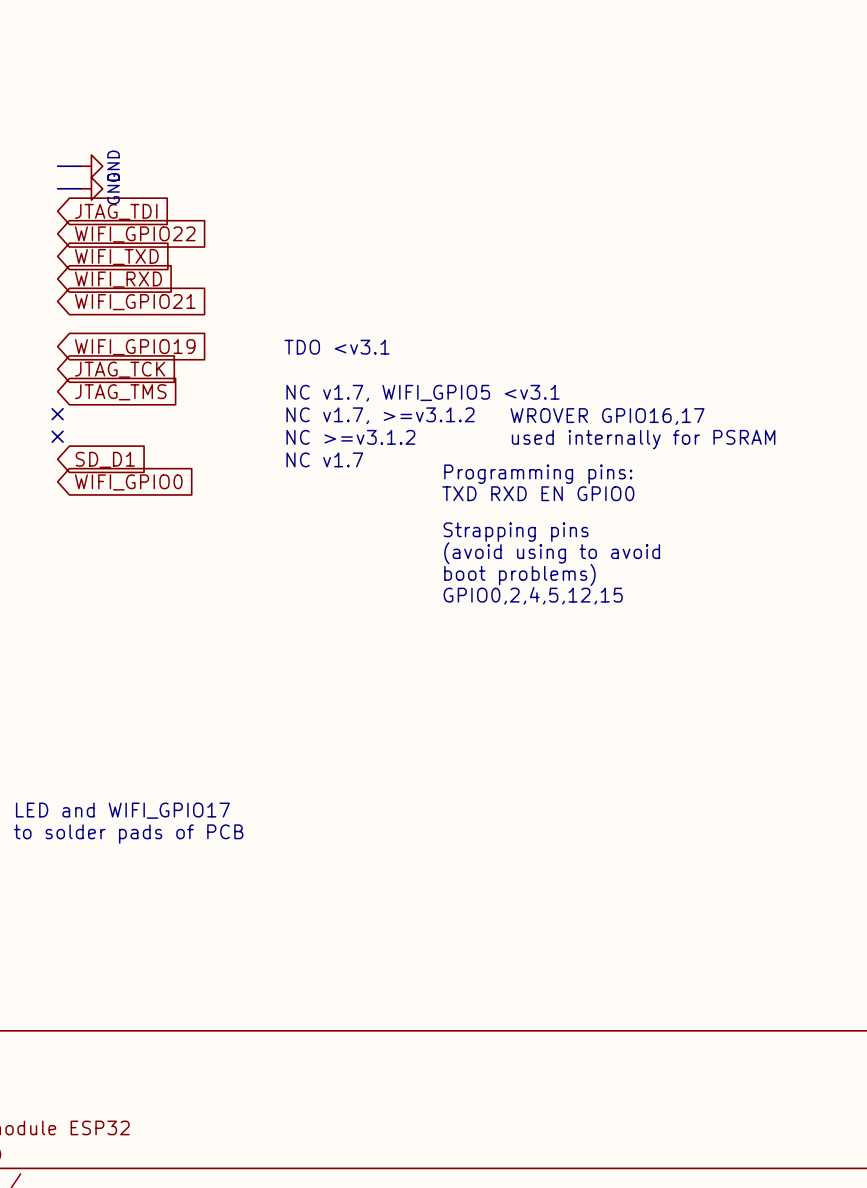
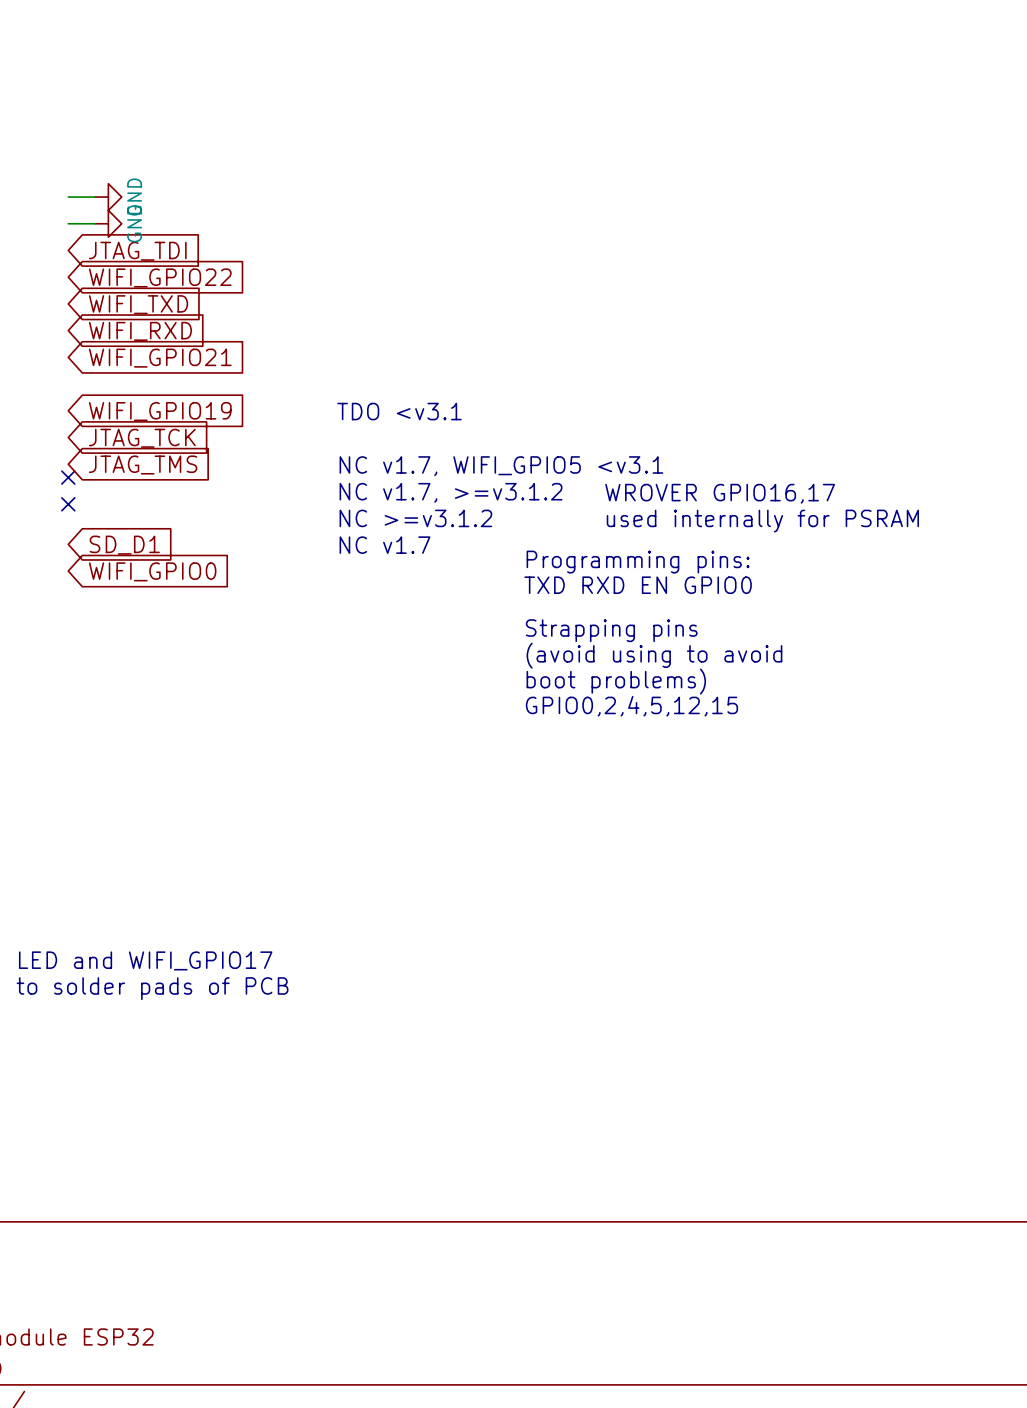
no-connect mark: none -> (68, 477)
no-connect mark: (57, 414) -> none
no-connect mark: none -> (68, 504)
no-connect mark: (57, 436) -> none

